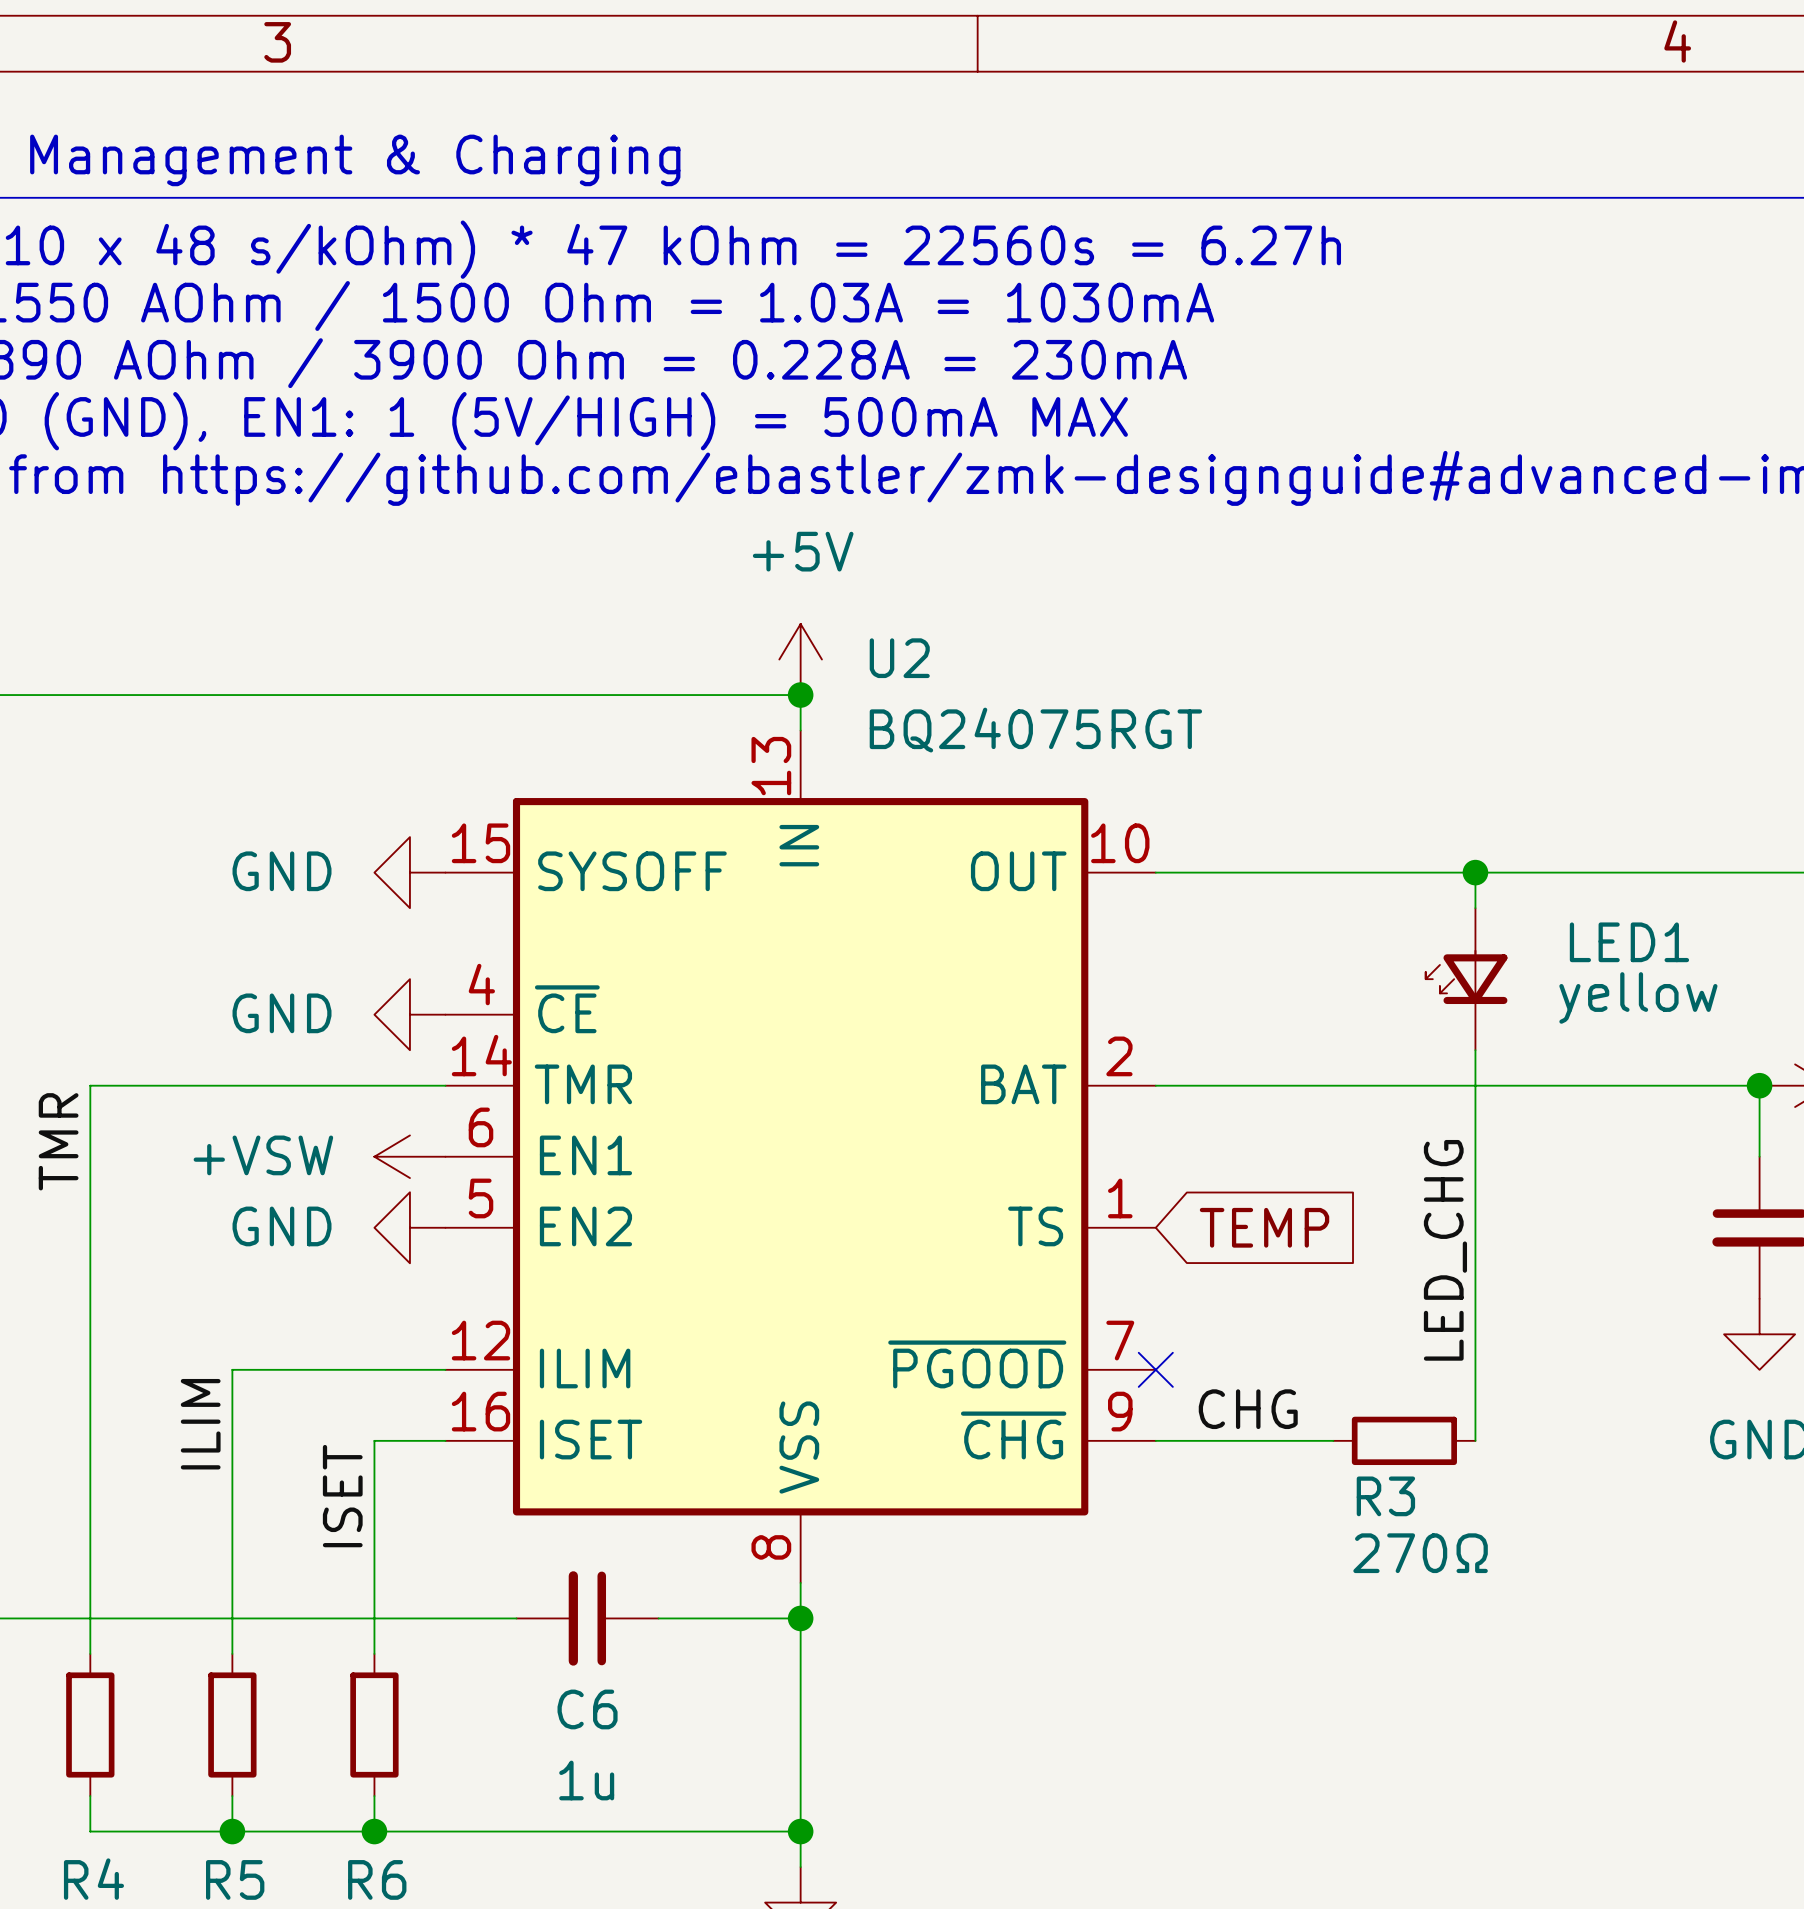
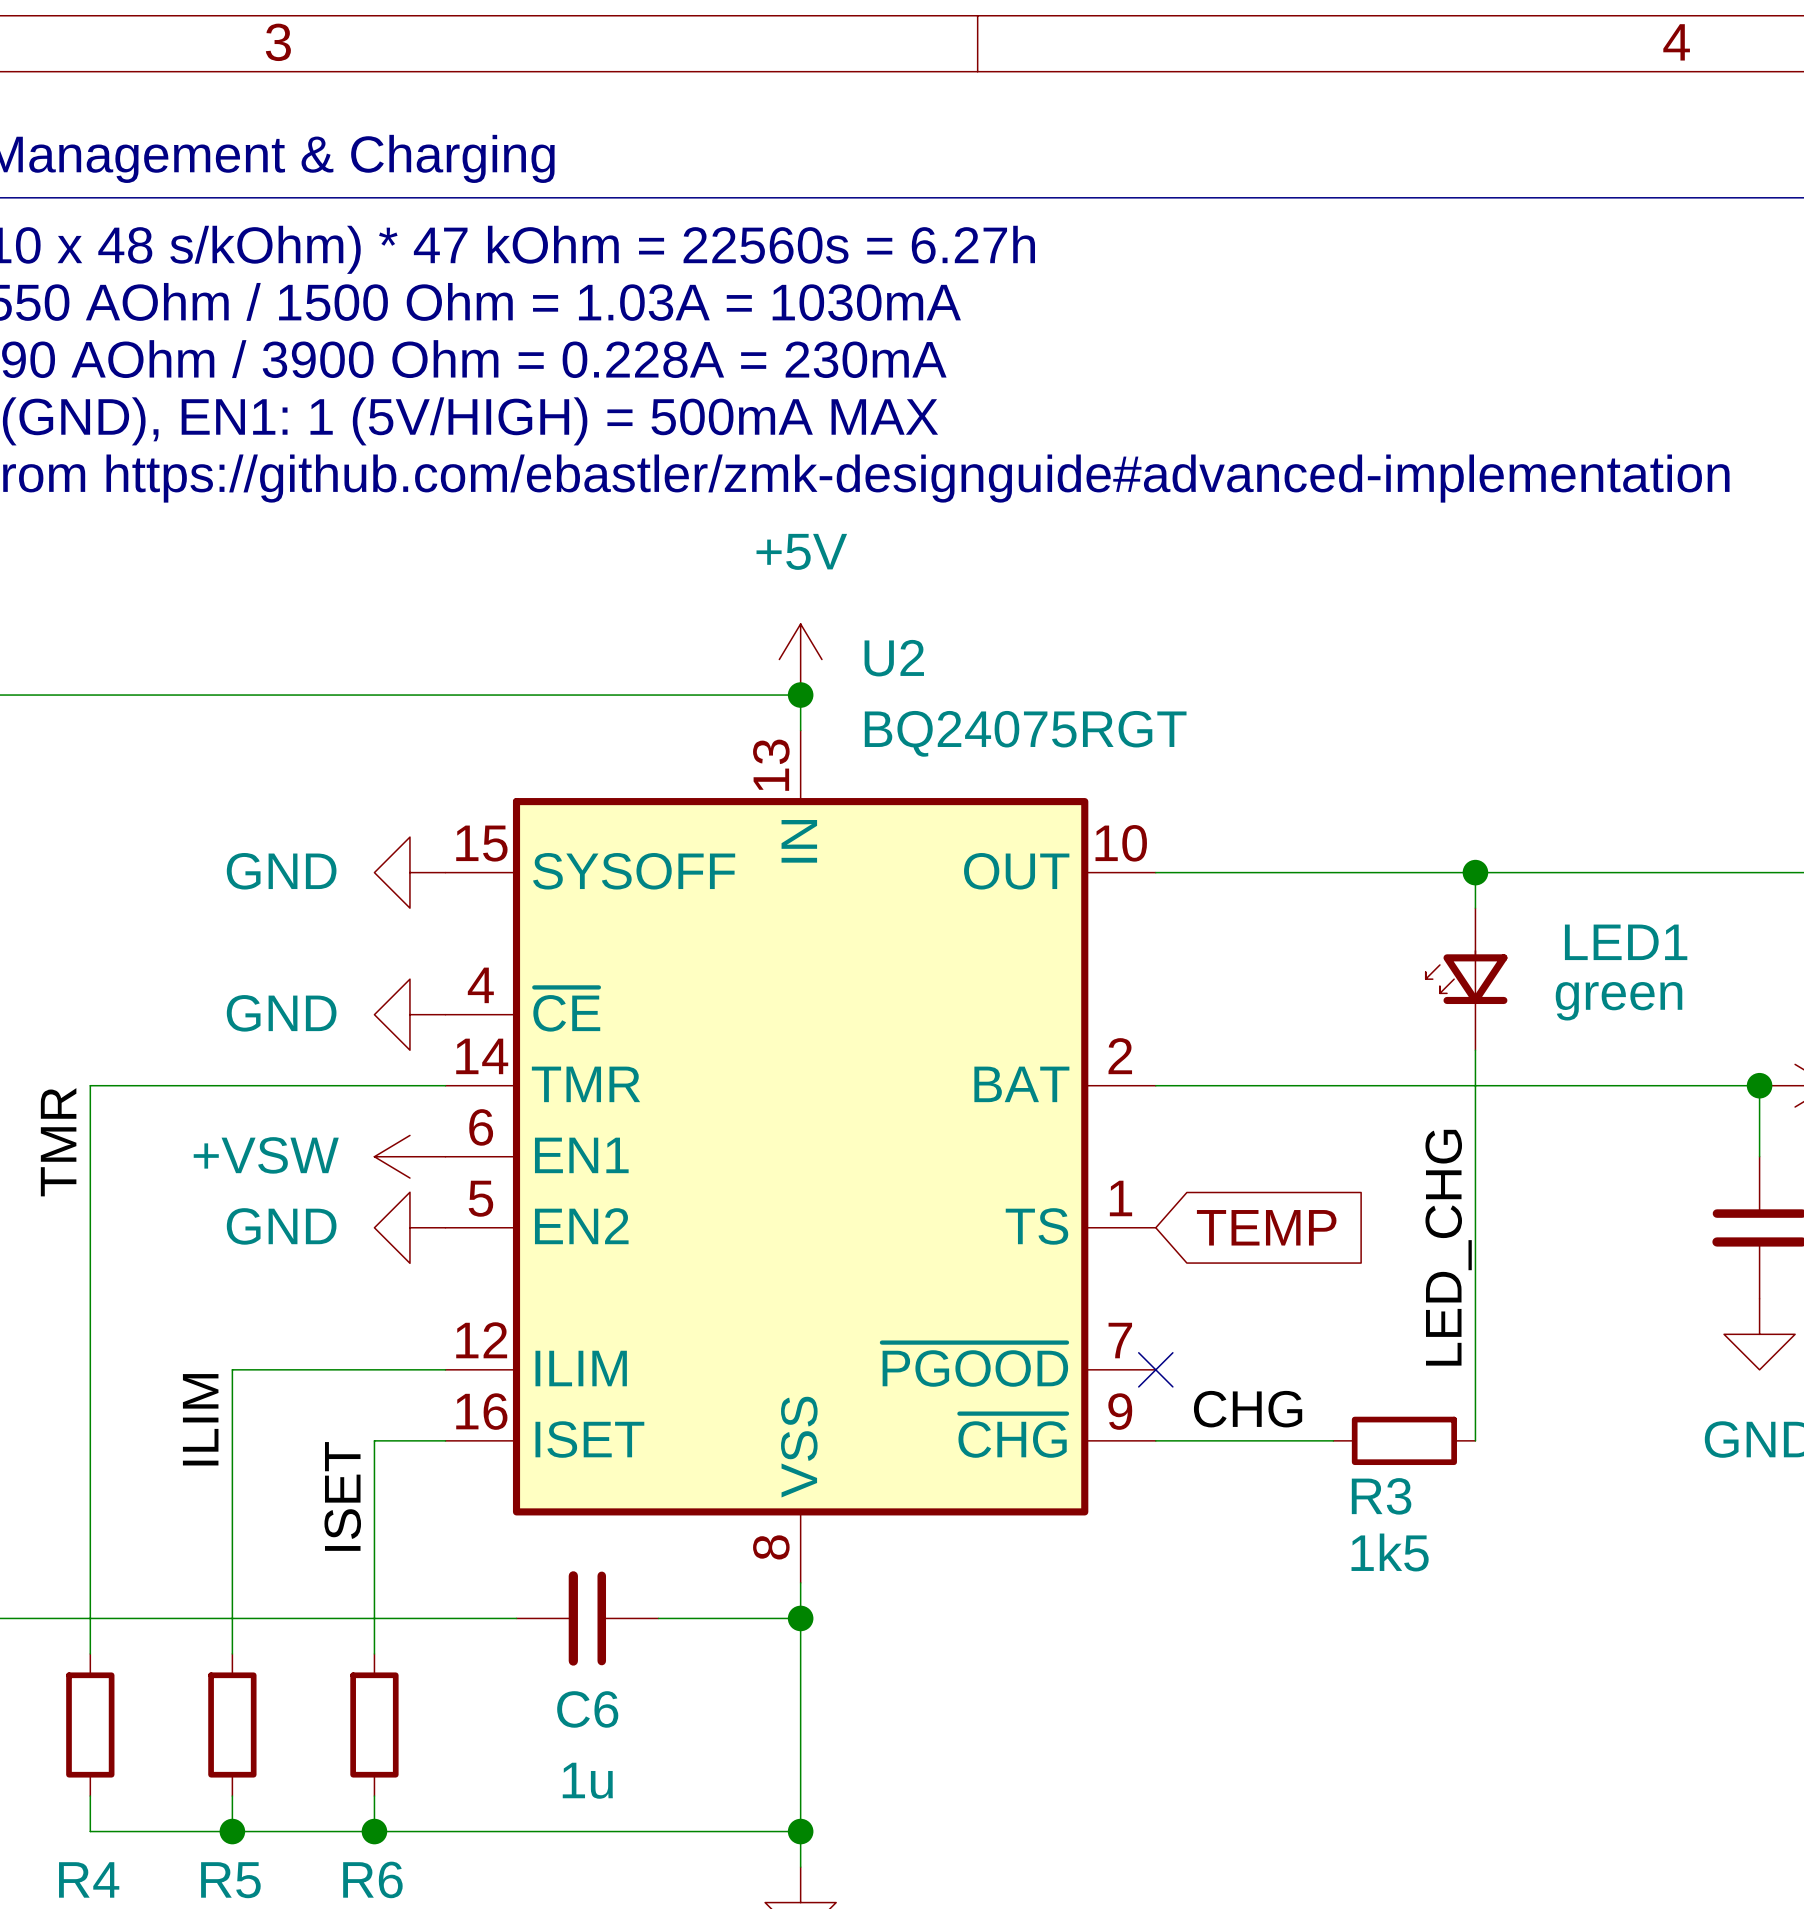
LED1 value: yellow (1638, 997) -> green (1619, 1001)
R3 value: 270Ω (1420, 1553) -> 1k5 (1390, 1552)

